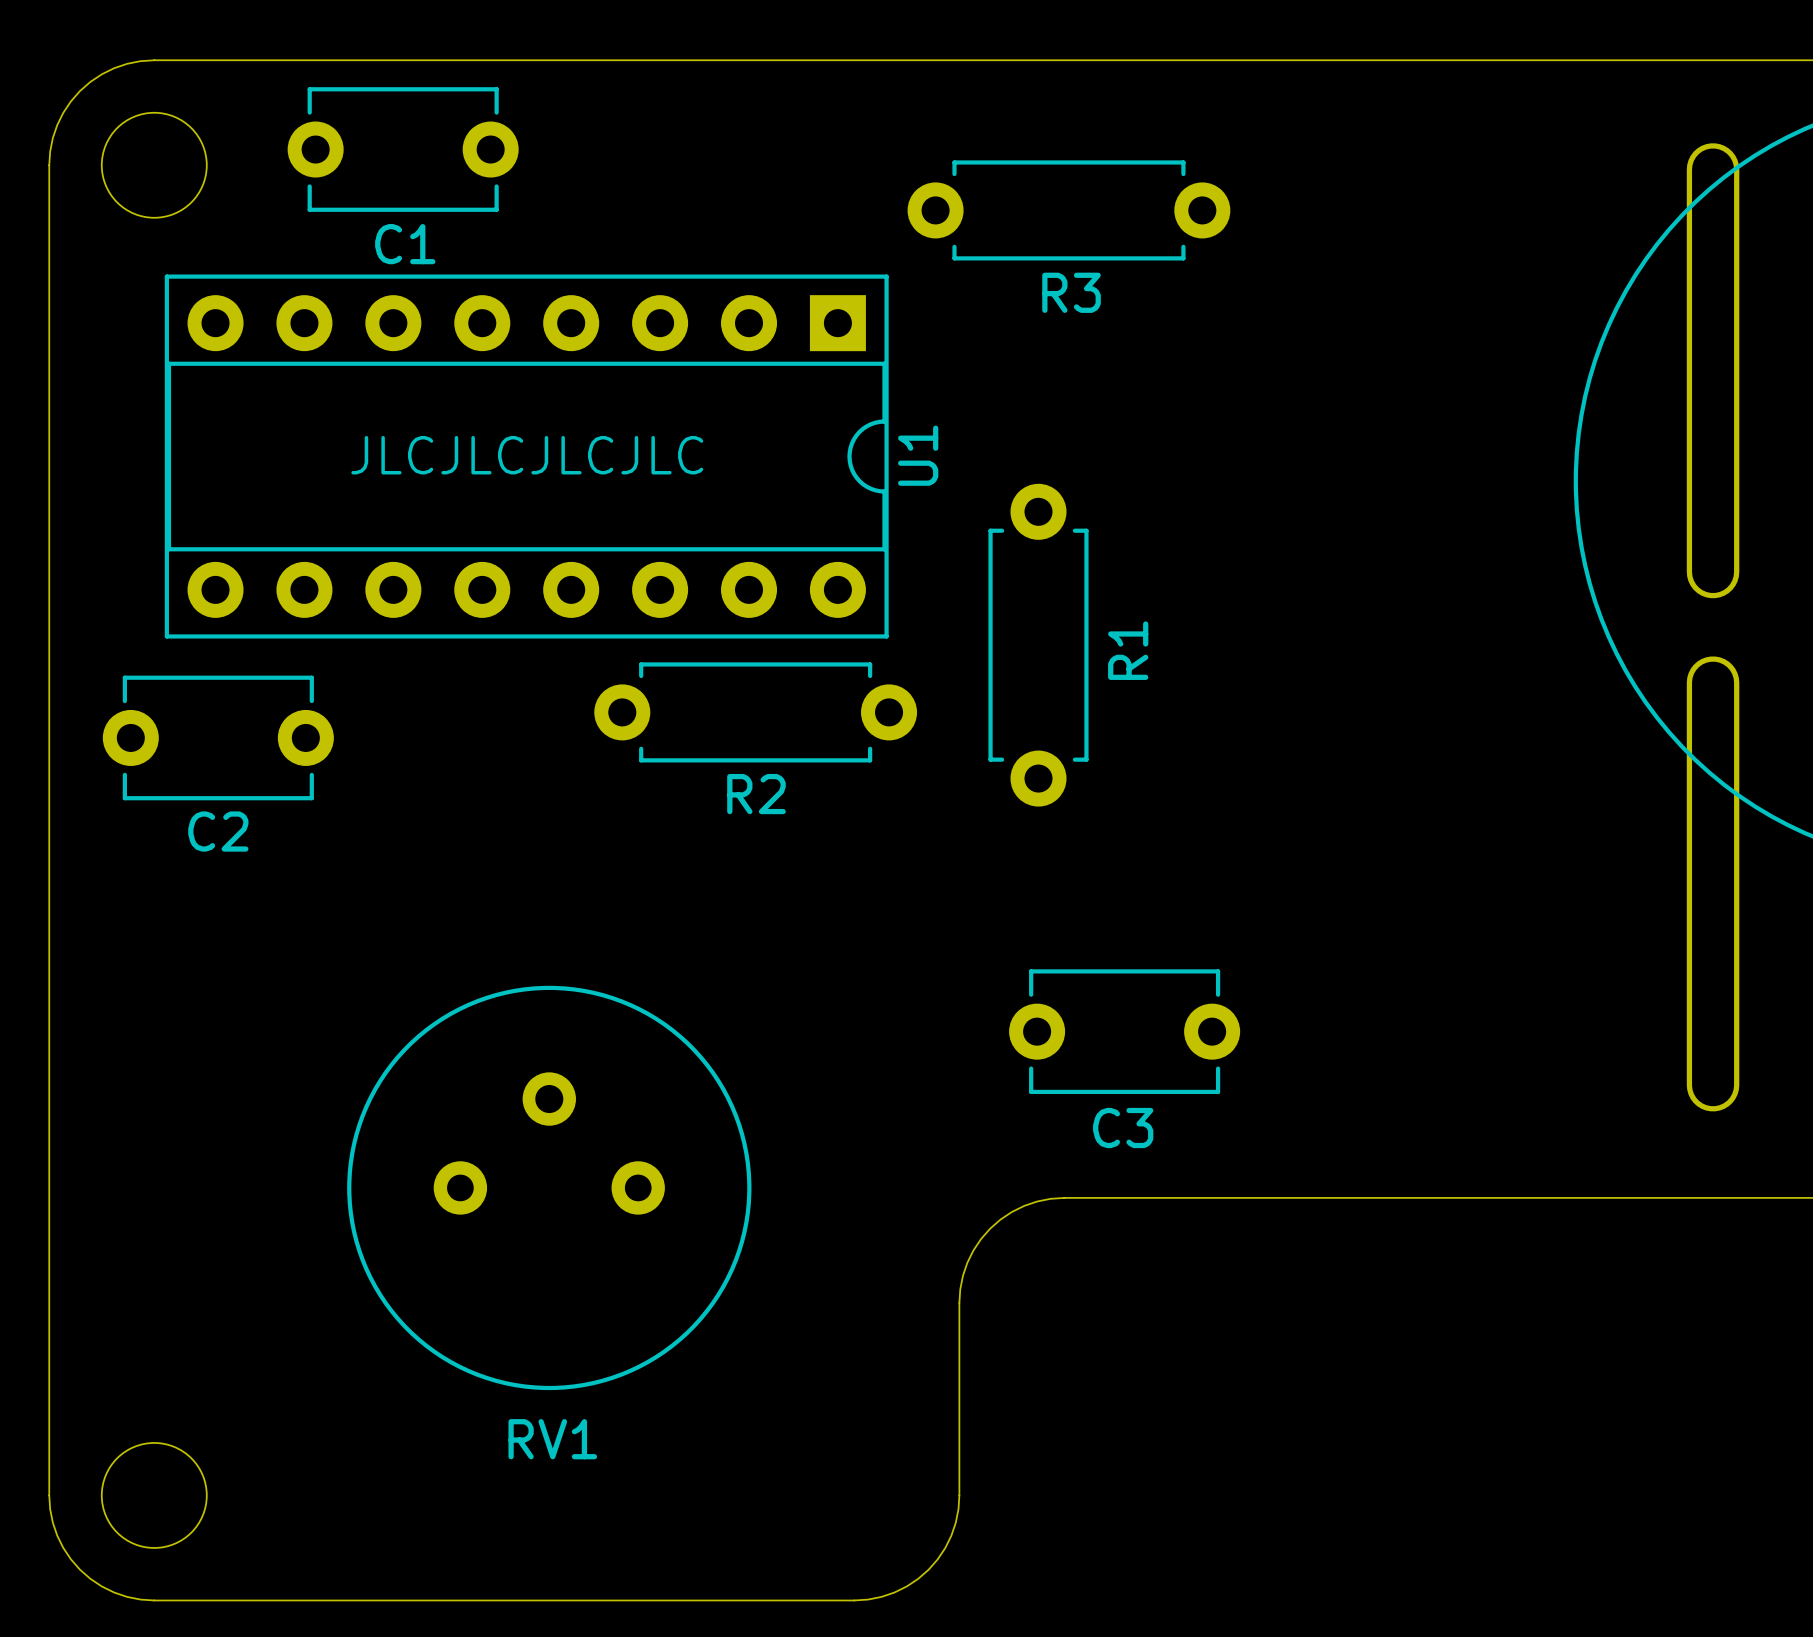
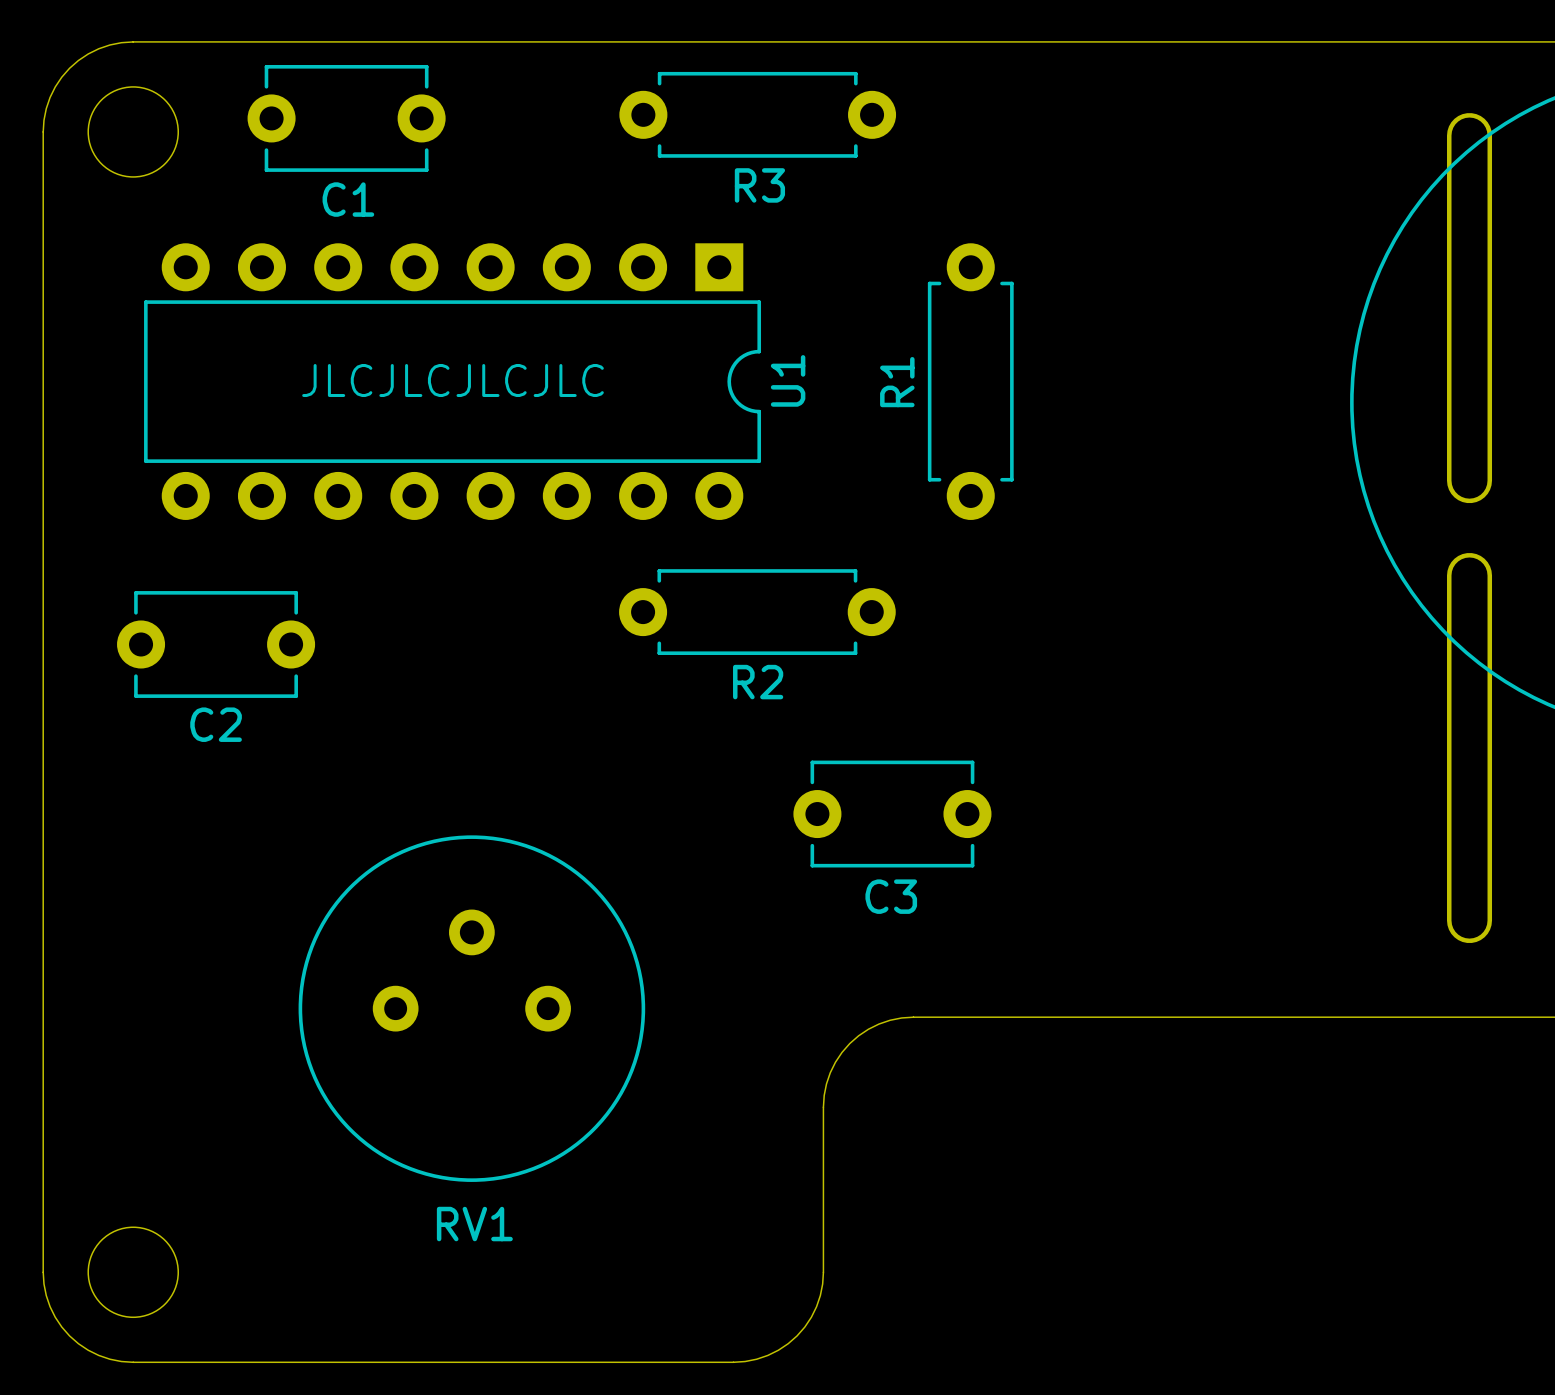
R3 position: (1068, 210) -> (757, 114)
U1 footprint: [164, 274, 889, 639] -> [144, 243, 762, 520]
R1 position: (1038, 645) -> (970, 381)
R1 name position: R1 (1128, 650) -> R1 (897, 382)
R2 position: (755, 712) -> (757, 612)
C2 position: (218, 737) -> (216, 644)
C3 position: (1124, 1031) -> (892, 814)

